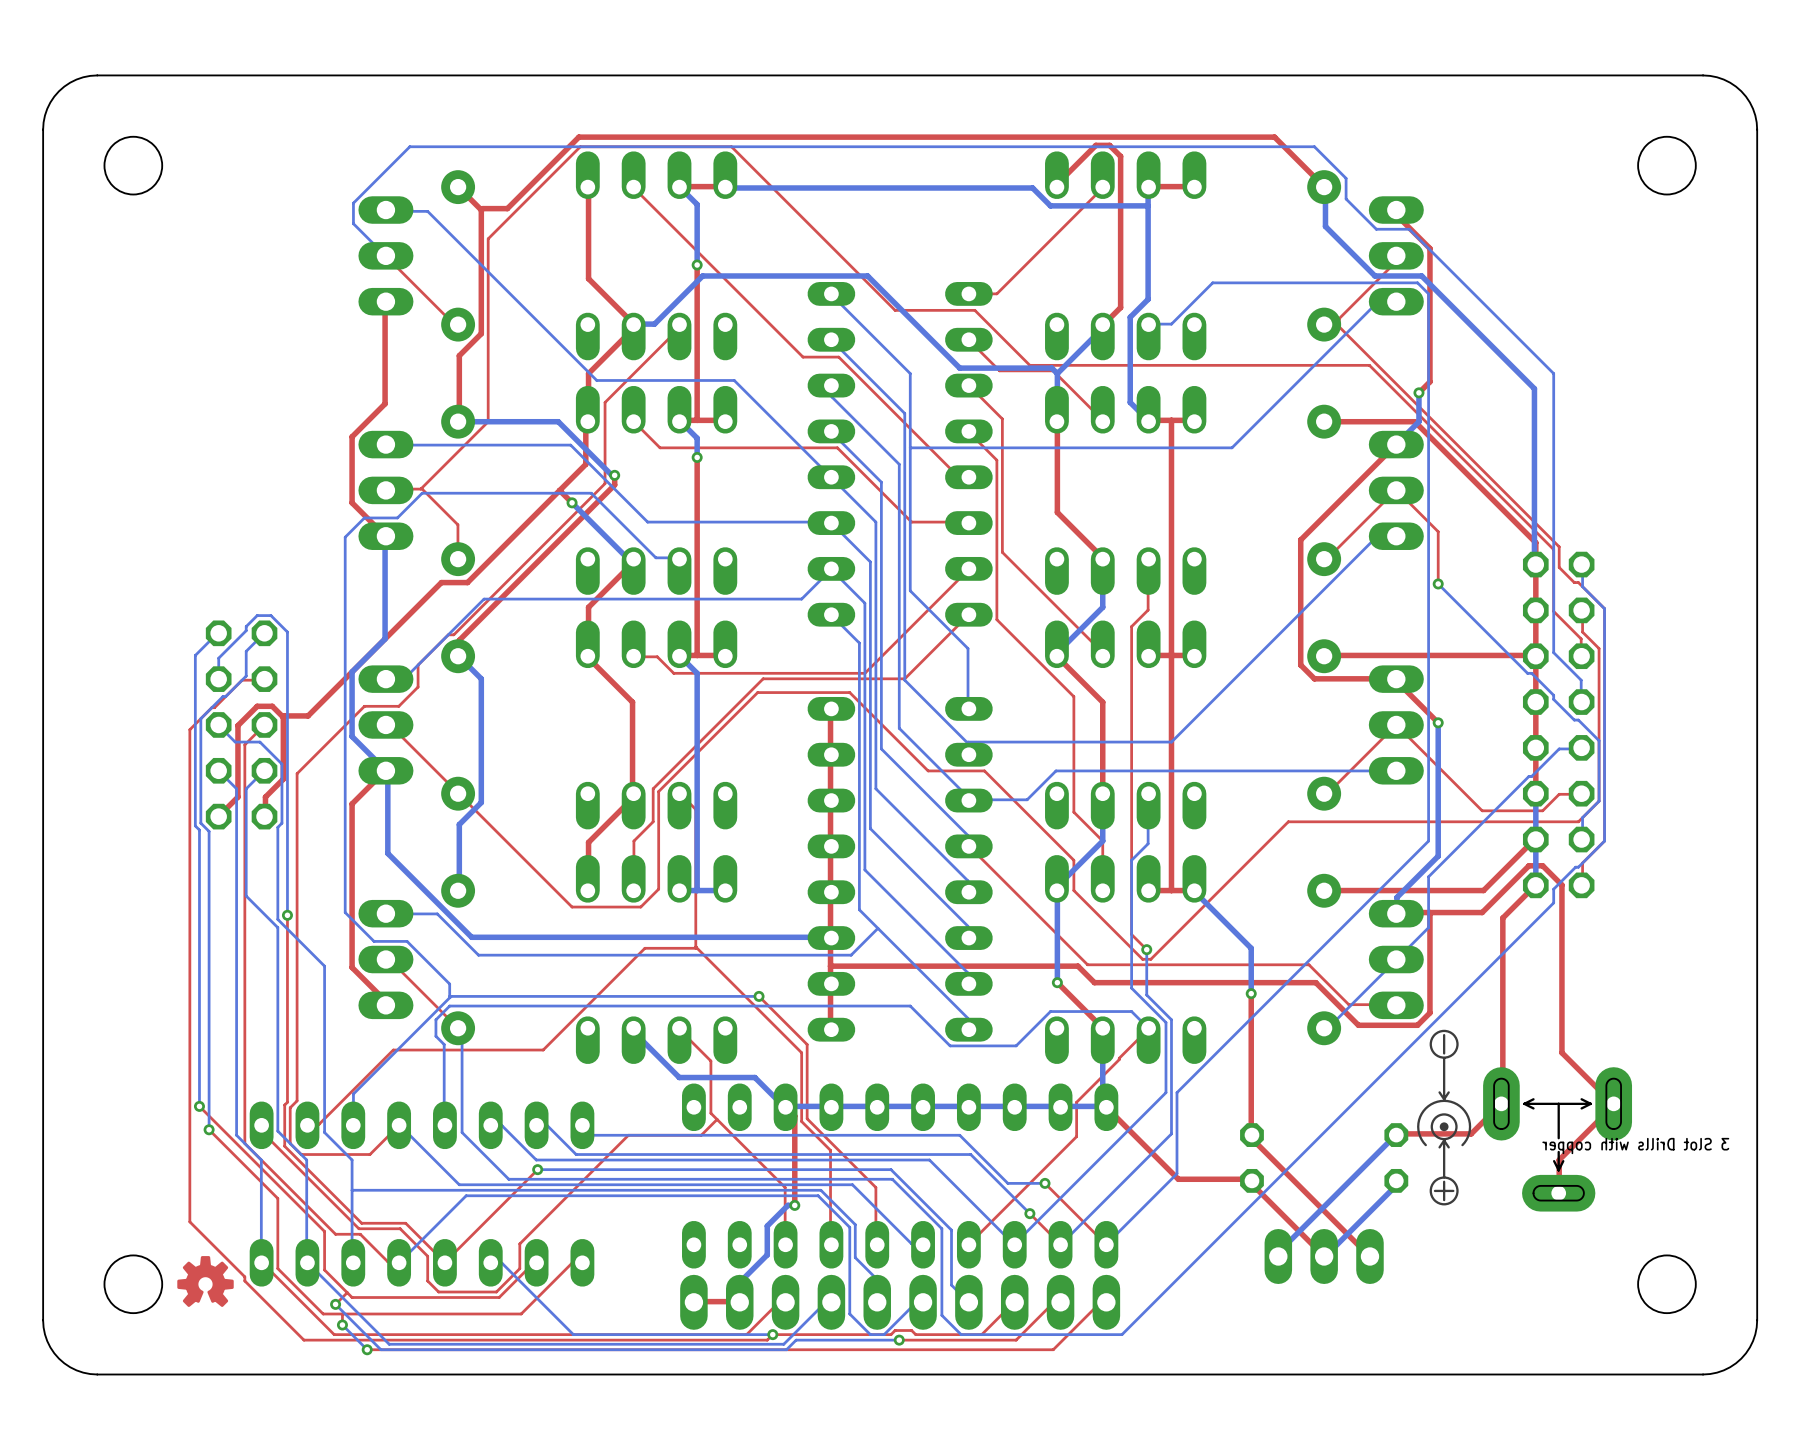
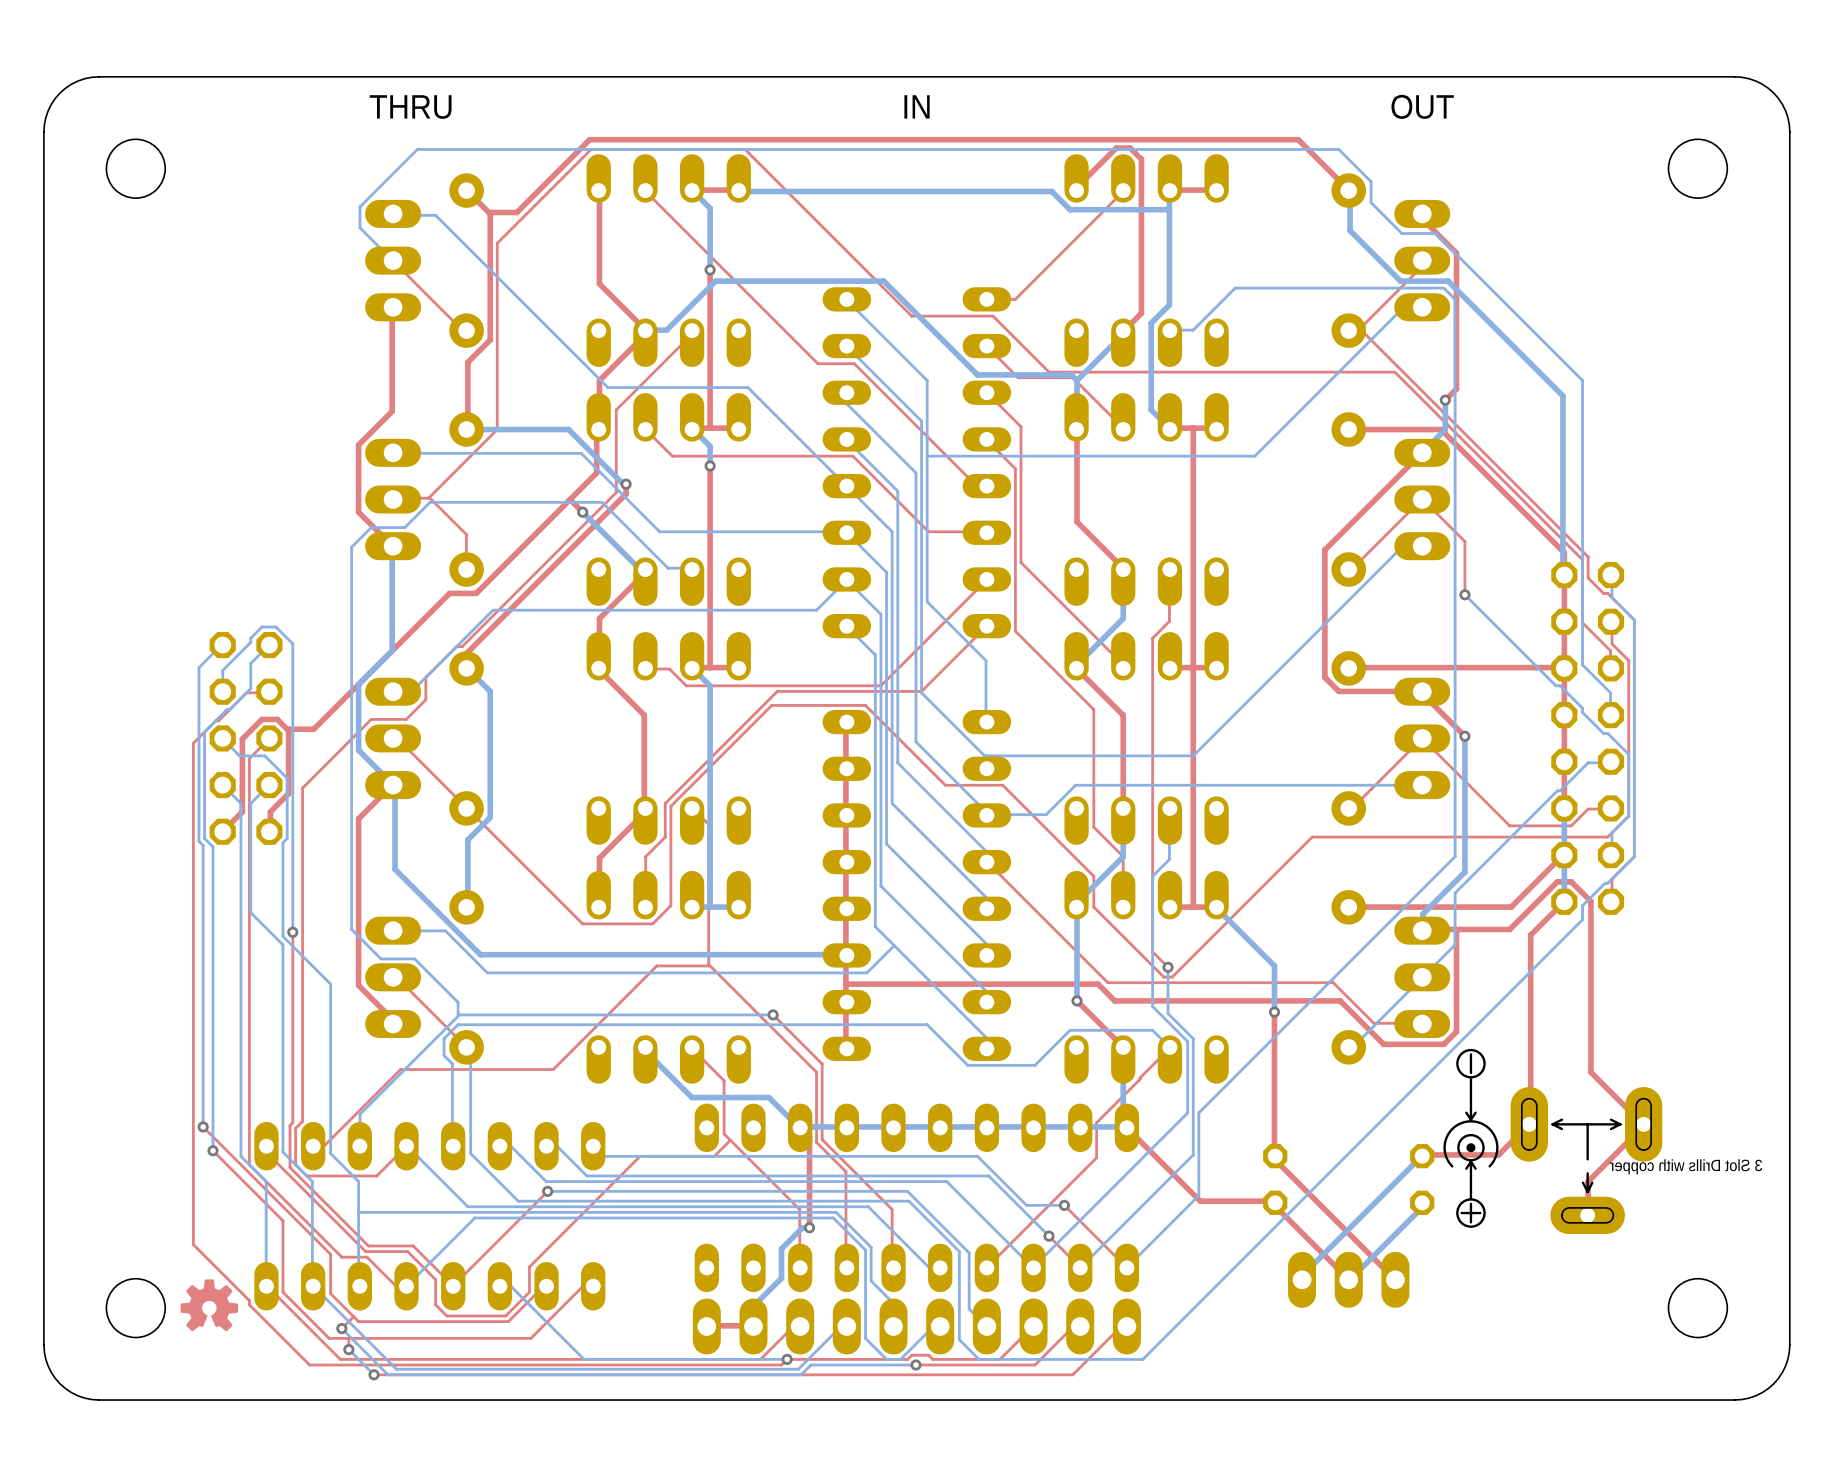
text: none -> THRU (410, 107)
text: none -> IN (917, 106)
text: none -> OUT (1422, 106)

